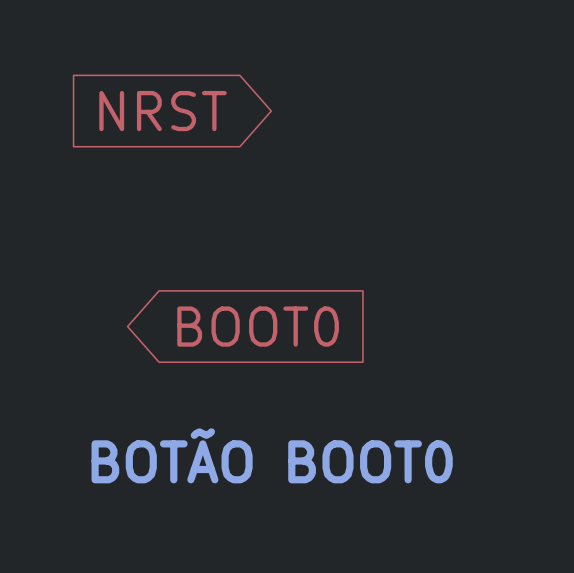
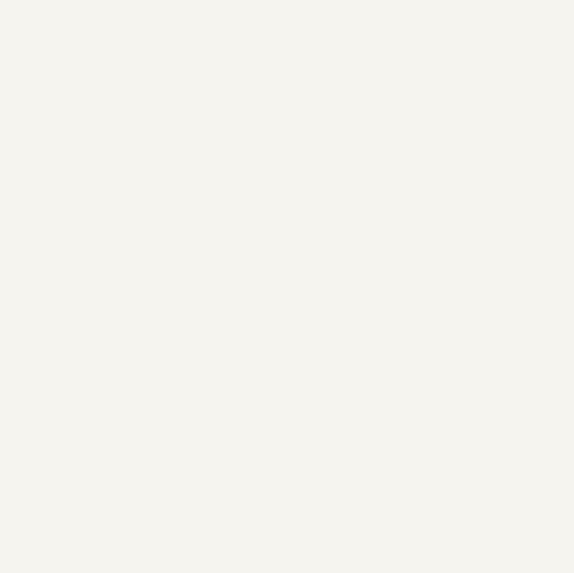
global label: NRST (163, 111) -> none
global label: BOOT0 (258, 326) -> none
text: BOTÃO BOOT0 (272, 455) -> none

